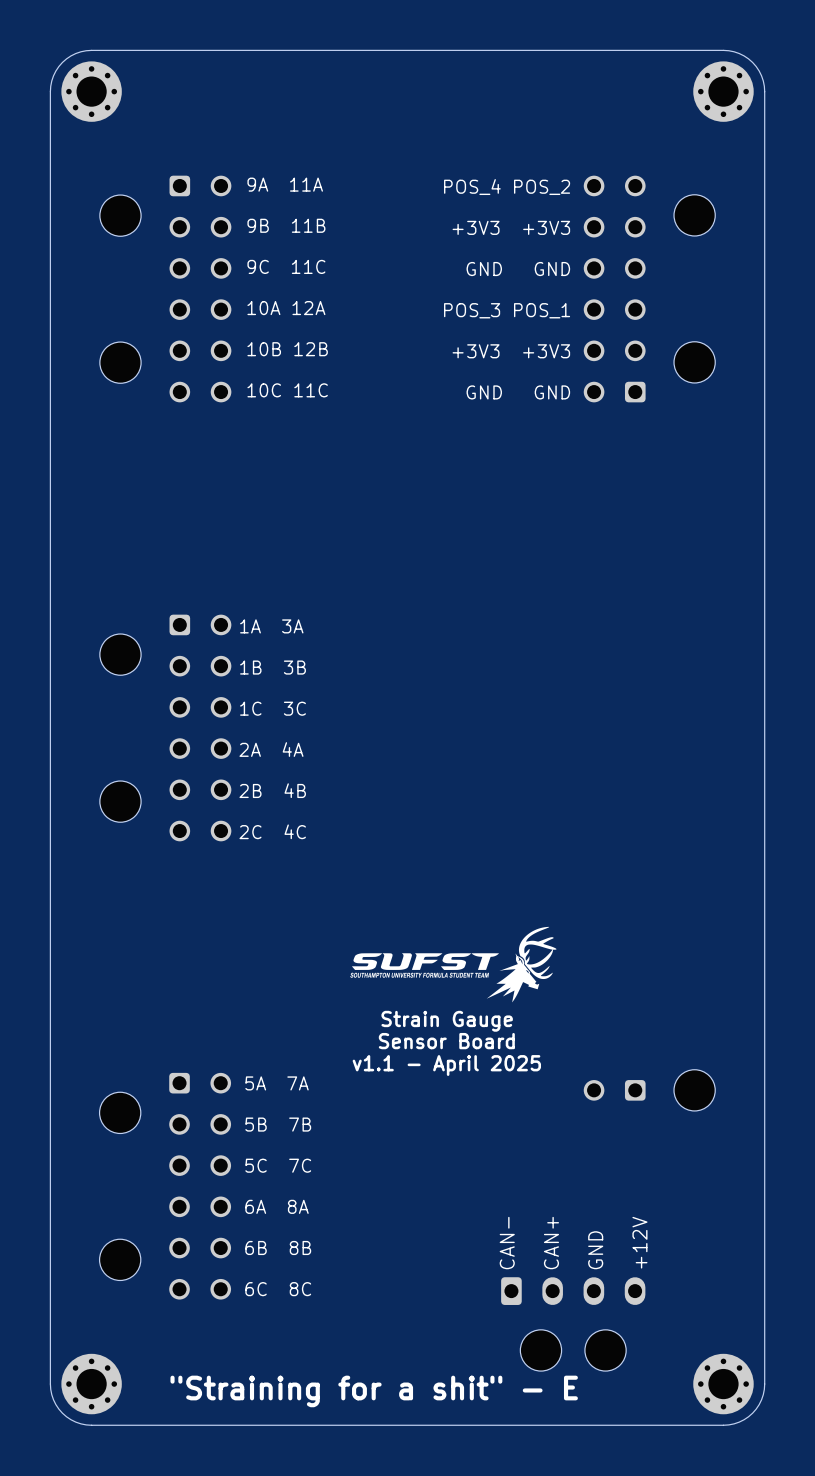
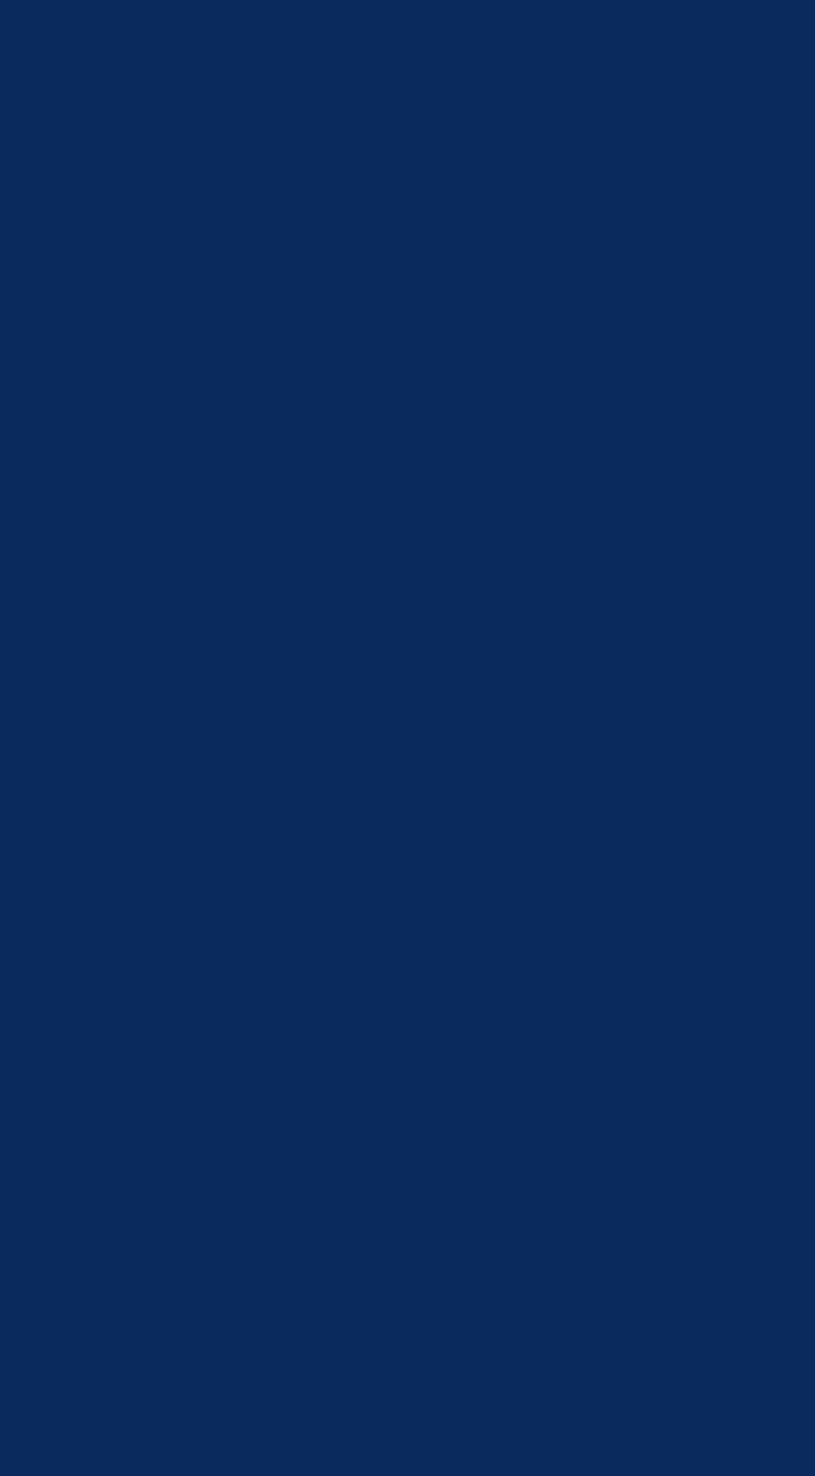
board edge: (723, 50) (91, 50) (80, 51) (66, 58) (53, 75) (50, 91) (50, 1384) (55, 1404) (62, 1413) (75, 1422) (91, 1425) (723, 1425) (739, 1422) (748, 1416) (761, 1399) (764, 1384) (764, 91) (761, 75) (752, 62) (739, 53) (723, 50) -> none
part: (91, 91) -> none
part: (723, 91) -> none
text: 9A 11A (285, 184) -> none
text: POS_4 POS_2 (507, 187) -> none
text: 9B 11B (286, 225) -> none
text: +3V3 +3V3 (511, 227) -> none
text: 9C 11C (286, 266) -> none
text: GND GND (518, 269) -> none
part: (165, 289) -> none
part: (649, 289) -> none
text: 10A 12A (286, 308) -> none
text: POS_3 POS_1 (507, 310) -> none
text: 10B 12B (287, 349) -> none
text: +3V3 +3V3 (511, 351) -> none
text: 10C 11C (287, 390) -> none
text: GND GND (518, 392) -> none
text: 1A 3A (271, 626) -> none
text: 1B 3B (273, 667) -> none
text: 1C 3C (273, 708) -> none
part: (165, 727) -> none
text: 2A 4A (271, 749) -> none
text: 2B 4B (272, 790) -> none
text: 2C 4C (272, 831) -> none
drawing: [350, 926, 557, 1003] -> none
text: Strain Gauge (447, 1021) -> none
text: Sensor Board (446, 1041) -> none
text: v1.1 - April 2025 (446, 1065) -> none
text: 5A 7A (277, 1083) -> none
part: (649, 1090) -> none
text: 5B 7B (278, 1124) -> none
text: 5C 7C (278, 1165) -> none
part: (165, 1186) -> none
text: 6A 8A (277, 1206) -> none
text: +12V (639, 1242) -> none
text: CAN- (507, 1243) -> none
text: CAN+ (551, 1243) -> none
text: 6B 8B (278, 1247) -> none
text: GND (595, 1250) -> none
text: 6C 8C (278, 1289) -> none
part: (573, 1324) -> none
part: (91, 1384) -> none
part: (723, 1384) -> none
text: "Straining for a shit" - E (374, 1391) -> none

